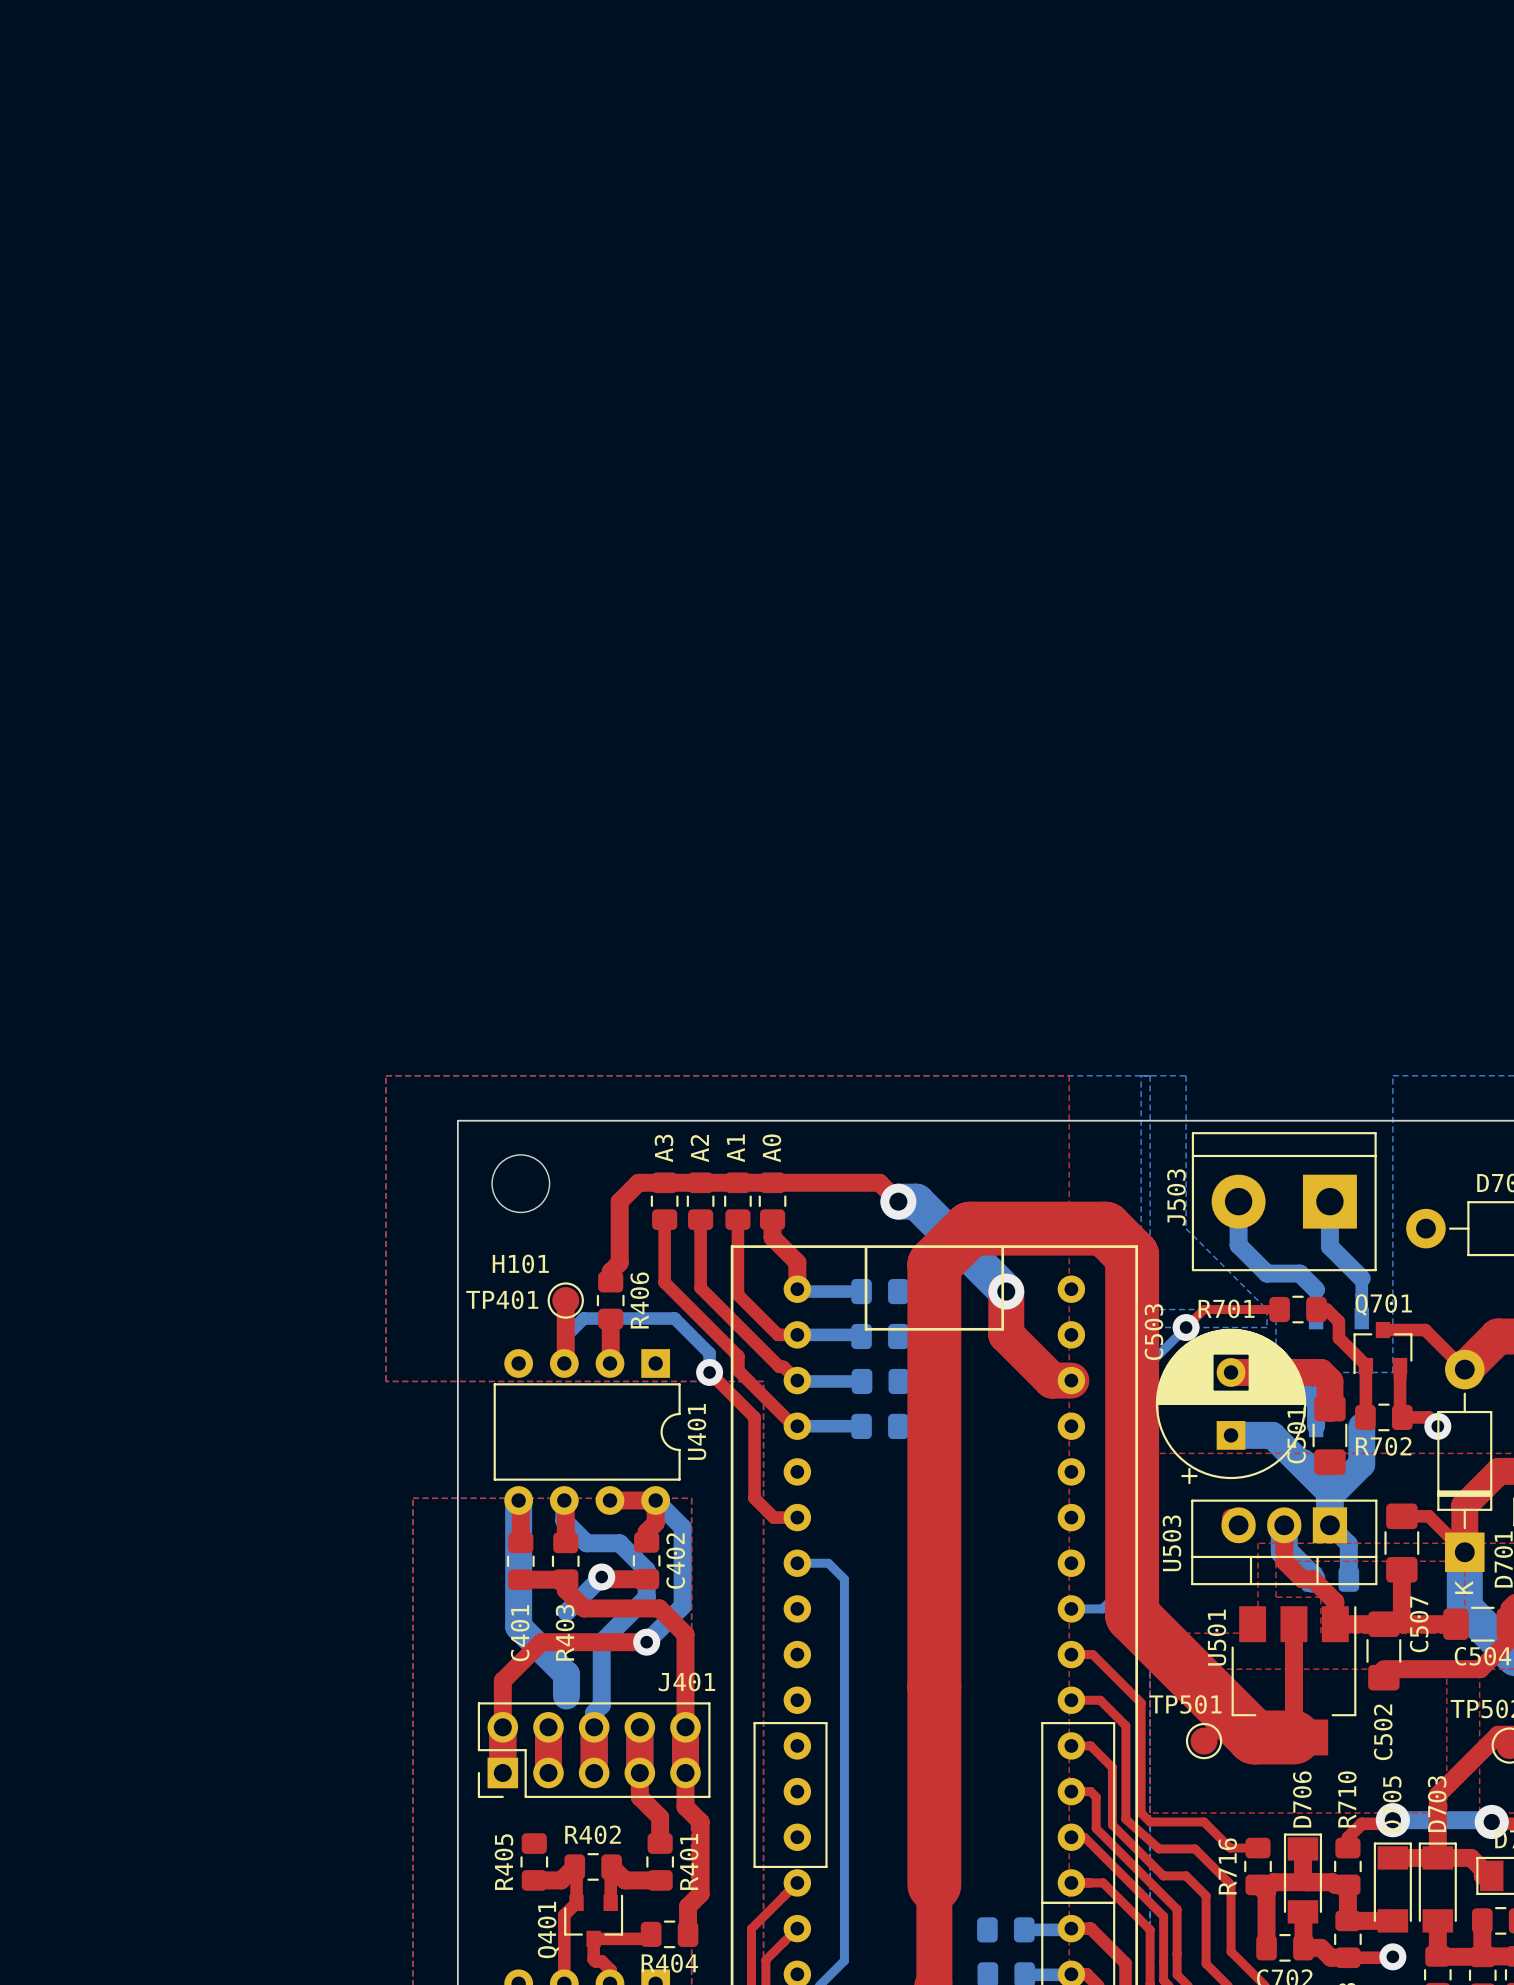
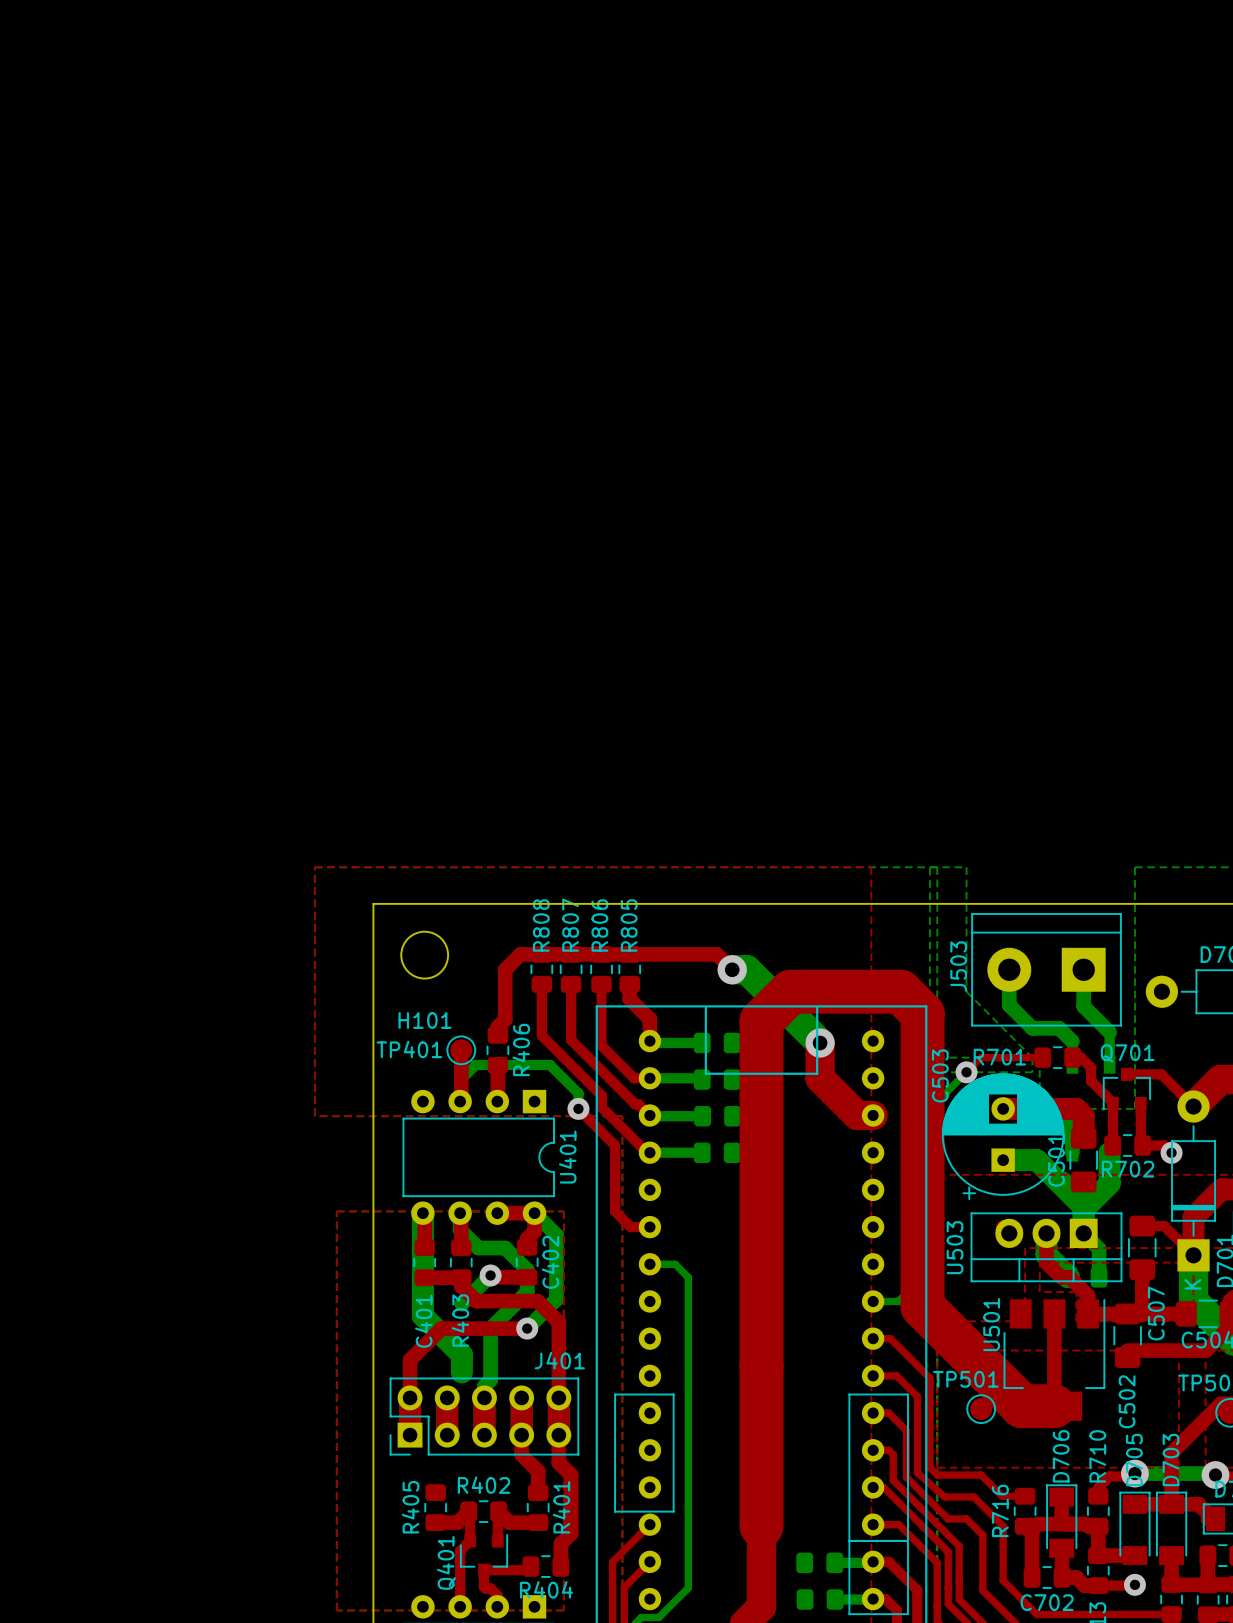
A3 name: A3 (663, 1148) -> R808 (541, 925)
A2 name: A2 (699, 1148) -> R807 (570, 925)
A1 name: A1 (735, 1148) -> R806 (599, 925)
A0 name: A0 (771, 1148) -> R805 (629, 925)

